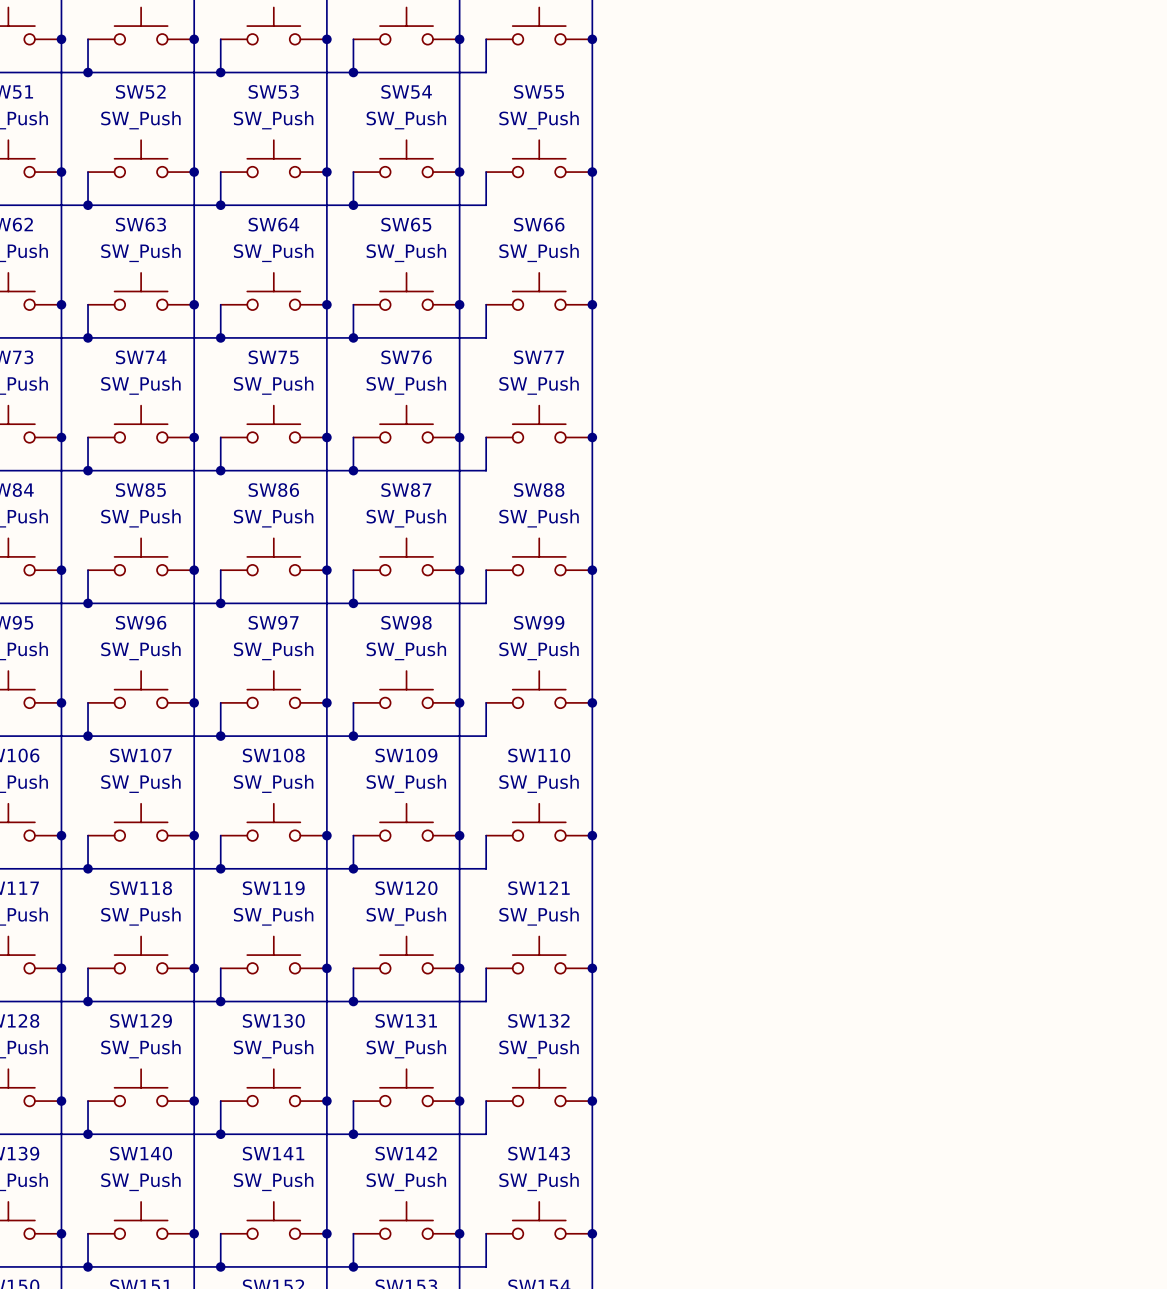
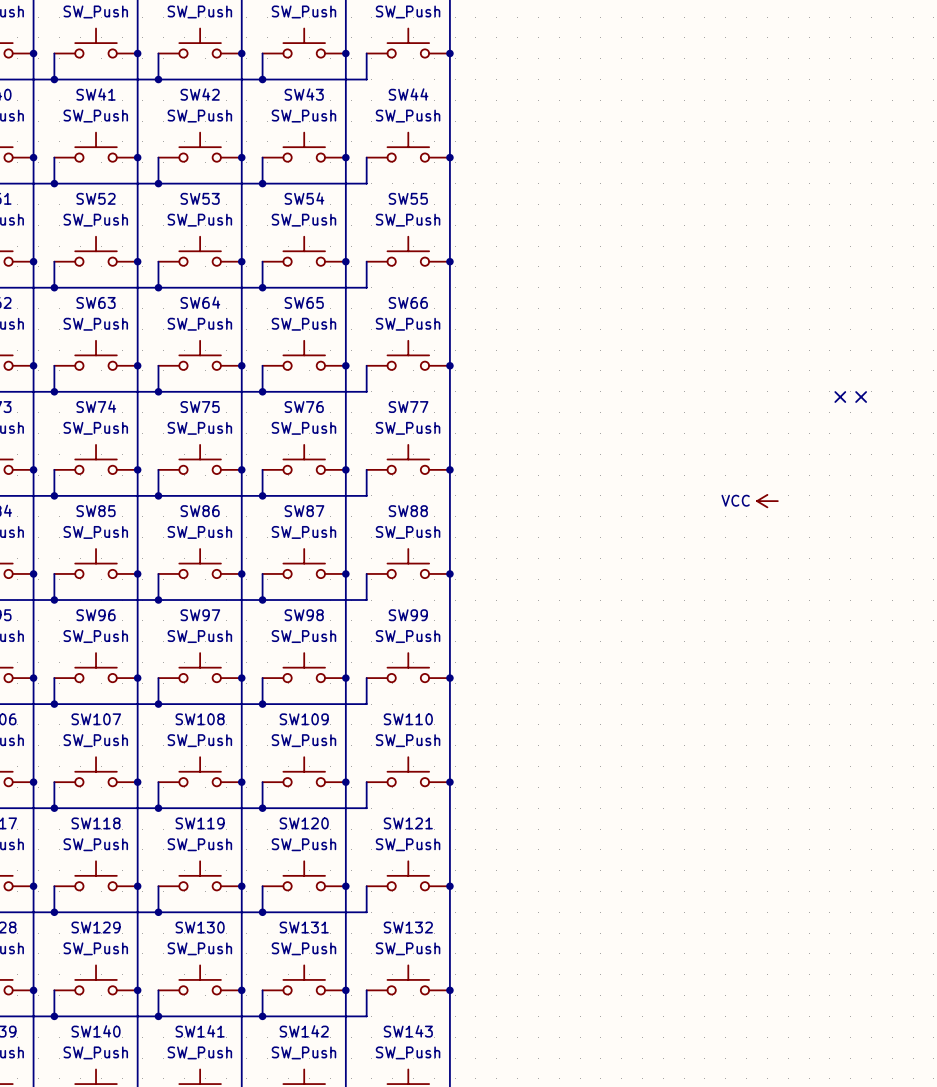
no-connect mark: none -> (840, 397)
no-connect mark: none -> (861, 397)
power symbol: none -> VCC (767, 501)

